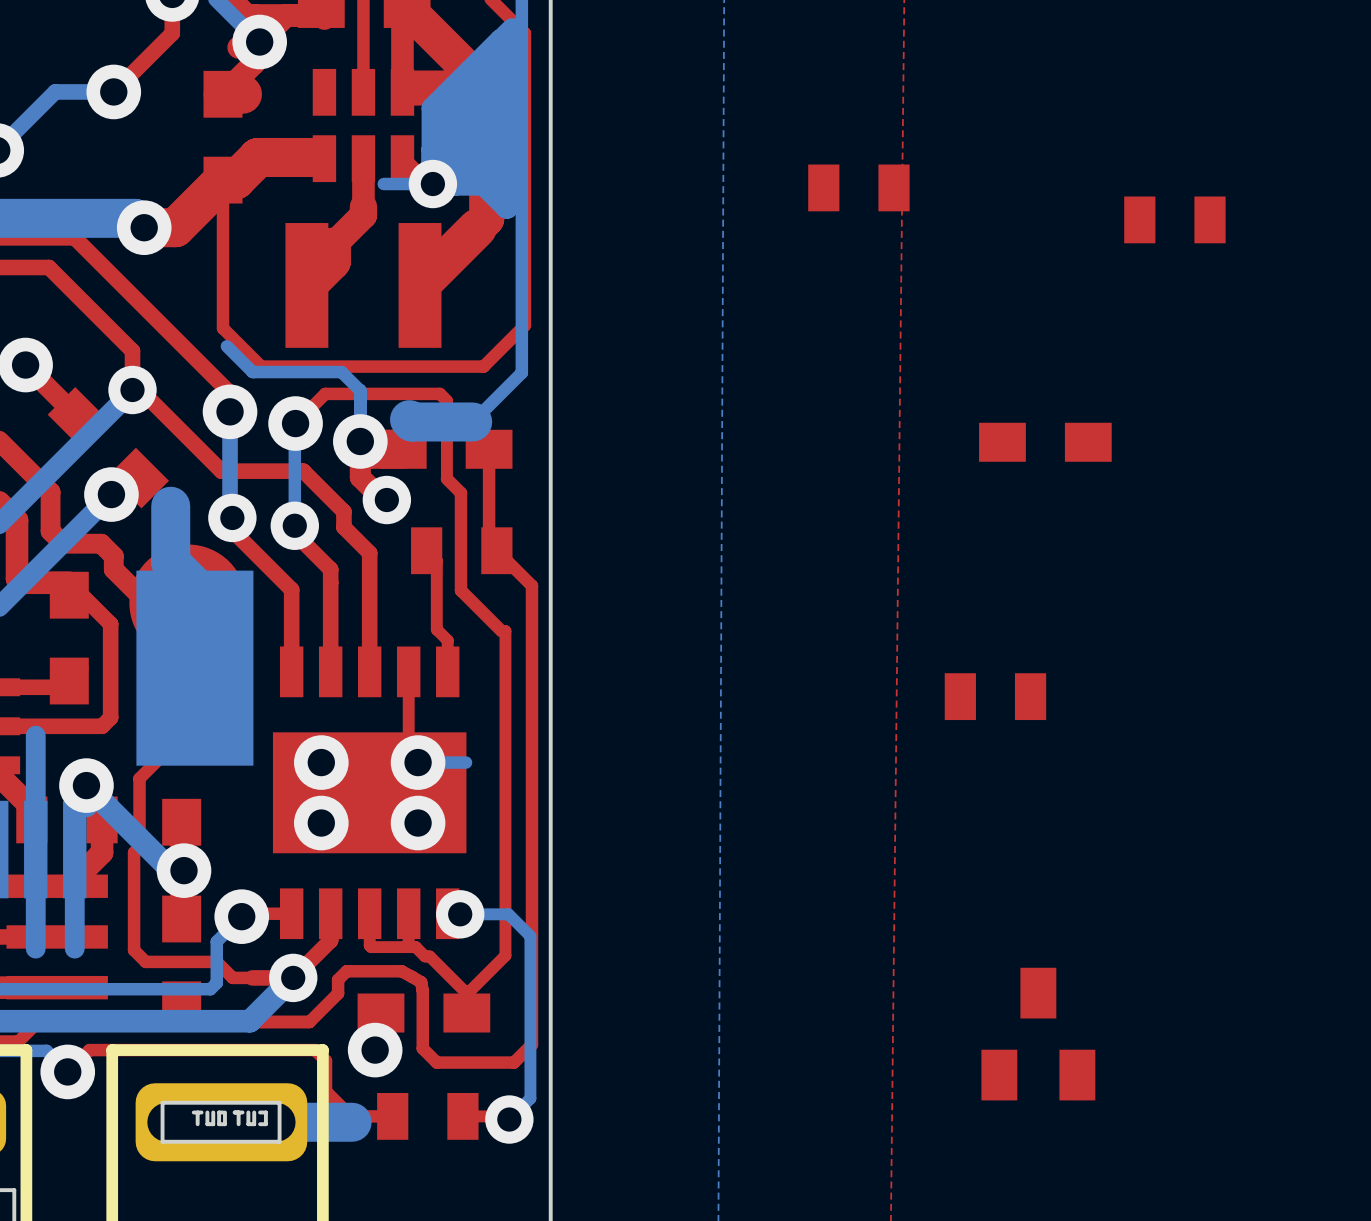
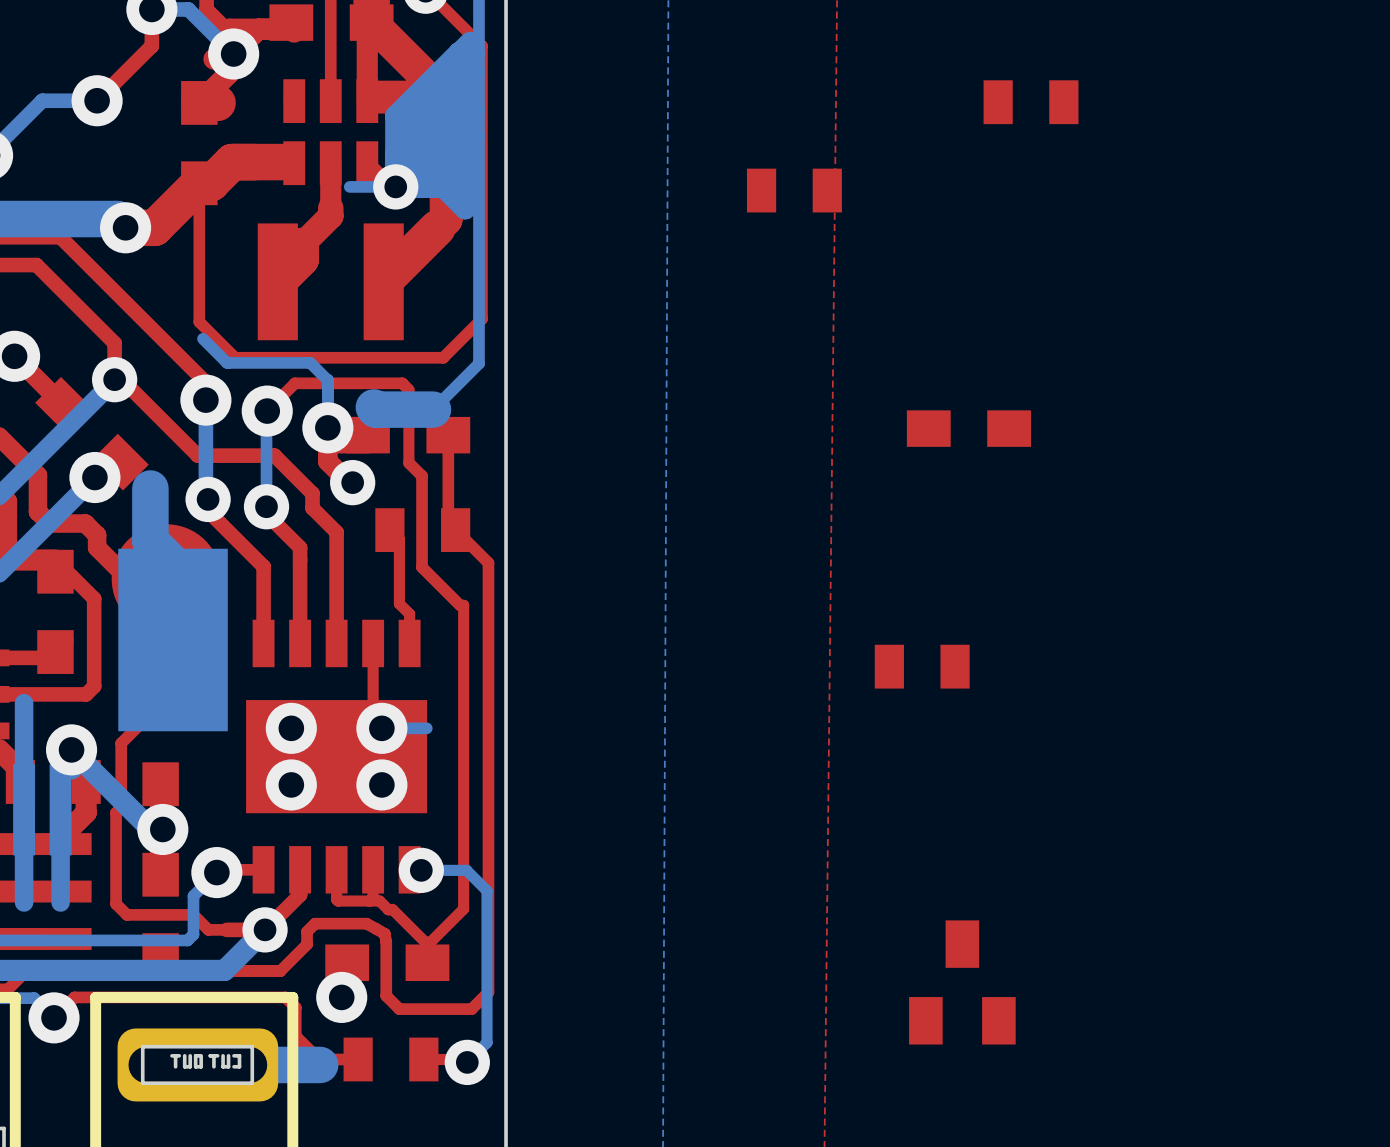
part position: (1174, 219) -> (1031, 102)

